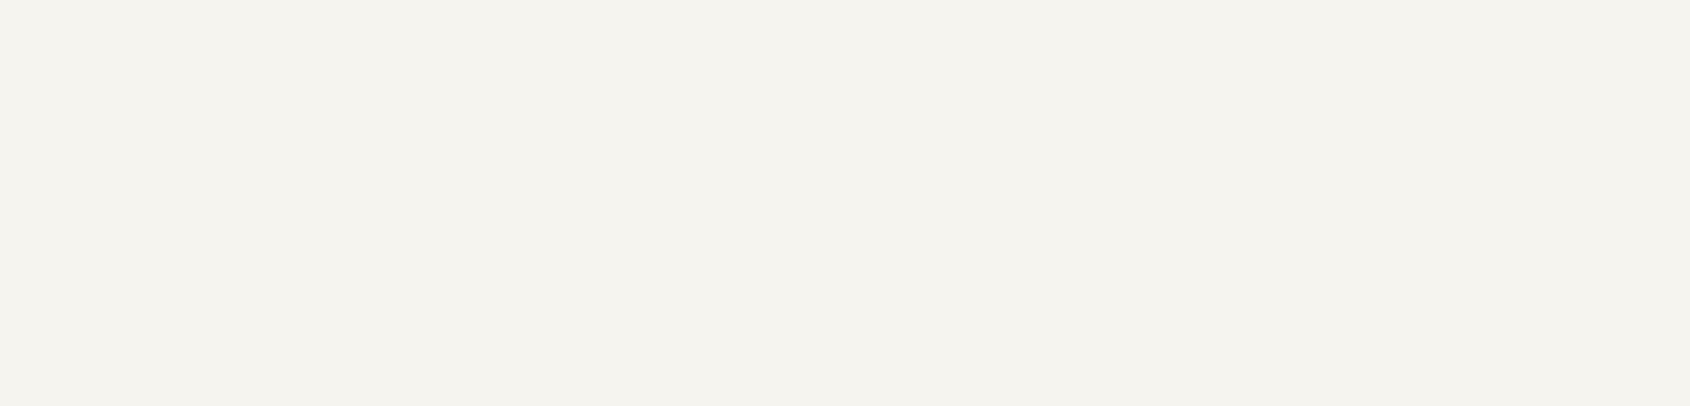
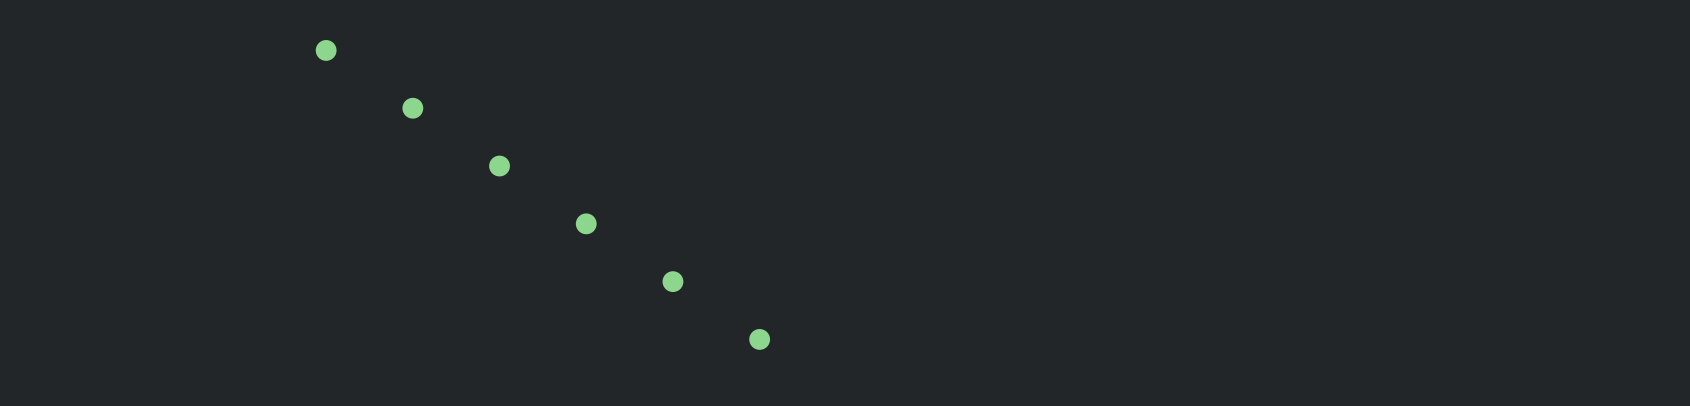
junction: none -> (326, 50)
junction: none -> (412, 108)
junction: none -> (499, 166)
junction: none -> (586, 223)
junction: none -> (672, 281)
junction: none -> (759, 339)

